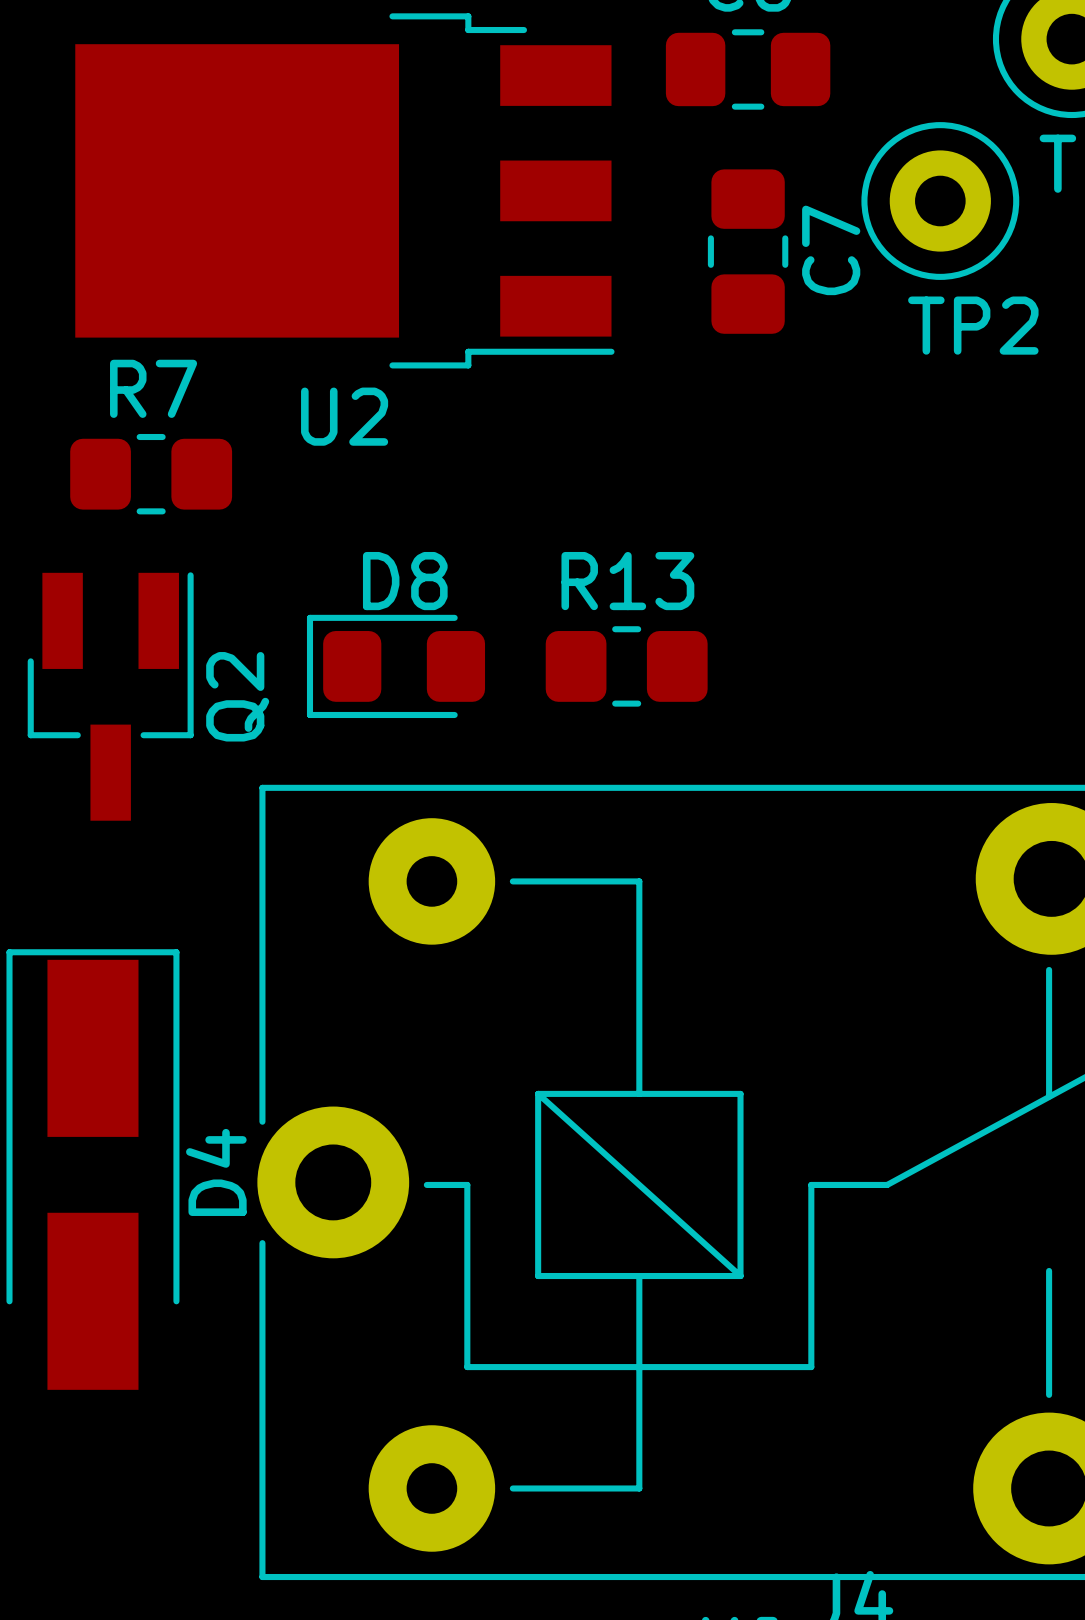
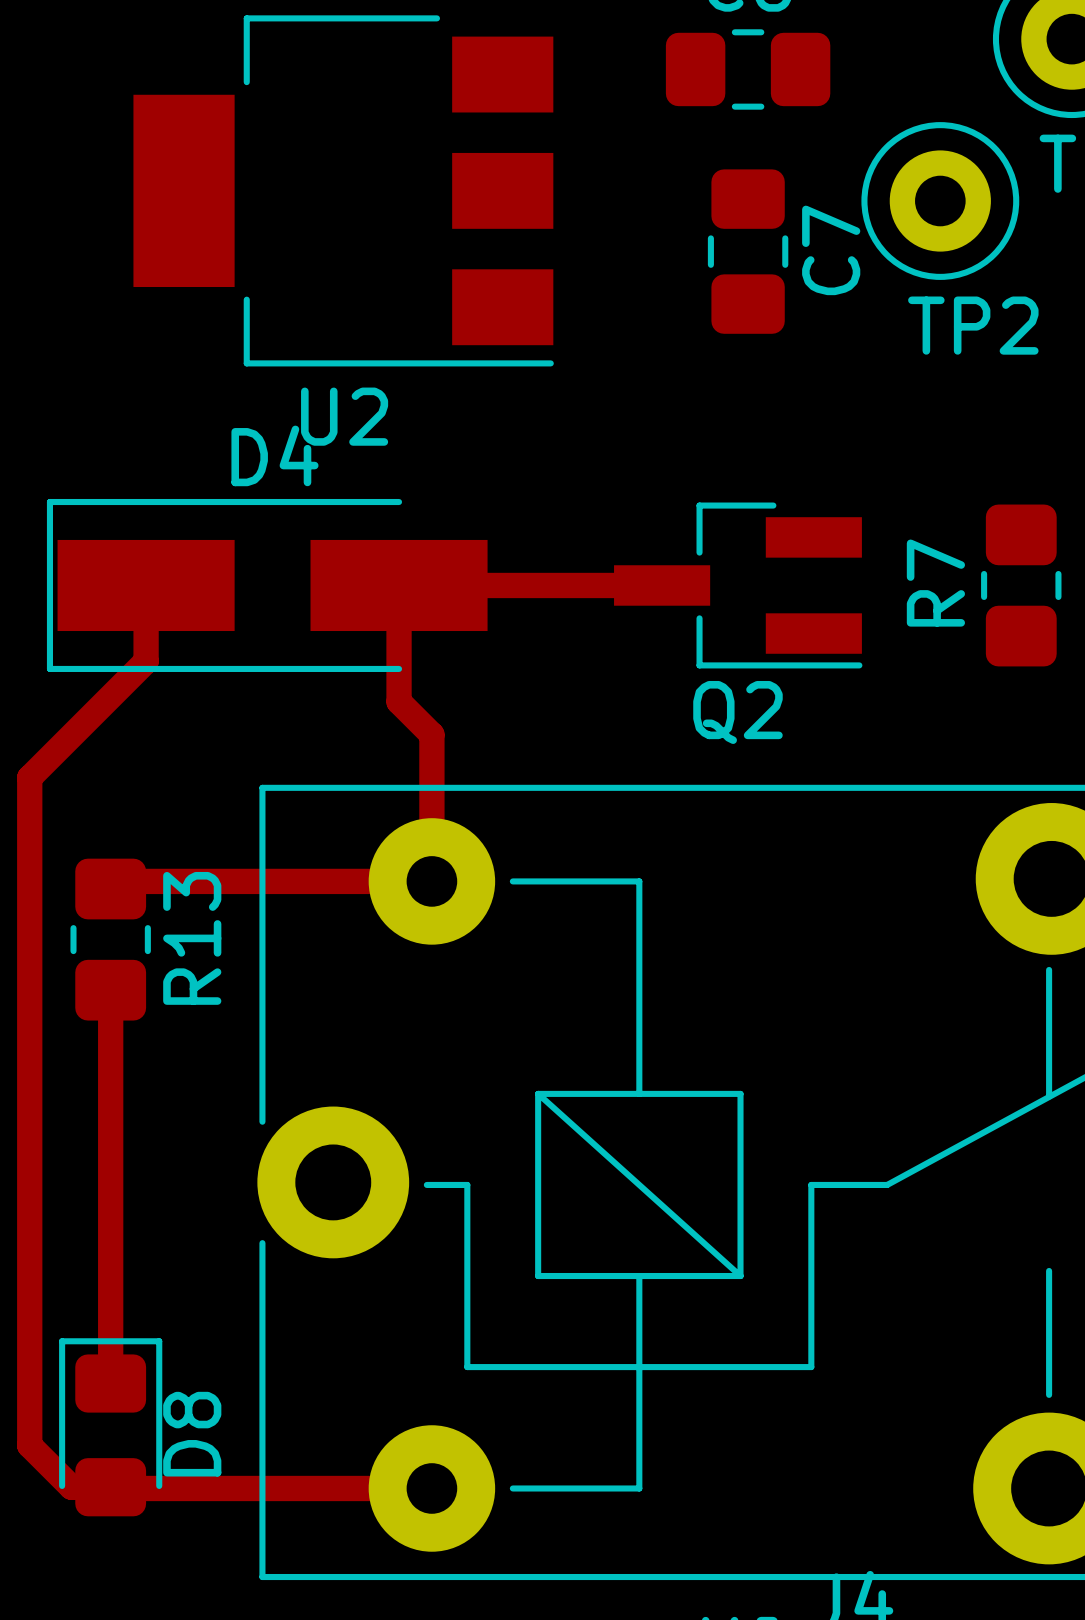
U2 footprint: [75, 13, 615, 369] -> [133, 15, 554, 367]
R7 name position: R7 (153, 388) -> R7 (935, 583)
R7 rotation: 0° (151, 474) -> 90° clockwise (1021, 585)
R7 position: (151, 474) -> (1021, 585)
track: none -> (146, 585) (146, 661) (29, 777) (29, 1445) (71, 1487) (431, 1488)
track: none -> (662, 585) (399, 585) (399, 701) (431, 734) (431, 881) (118, 881) (110, 889)
D8 rotation: 0° (396, 666) -> 90° clockwise (110, 1427)
D8 position: (396, 666) -> (110, 1427)
R13 rotation: 0° (626, 666) -> 90° clockwise (110, 939)
R13 position: (626, 666) -> (110, 939)
Q2 rotation: 0° (110, 696) -> 90° clockwise (738, 585)
Q2 position: (110, 696) -> (738, 585)
track: none -> (110, 990) (110, 1383)
D4 rotation: 0° (92, 1169) -> 90° counterclockwise (267, 585)
D4 position: (92, 1169) -> (267, 585)

